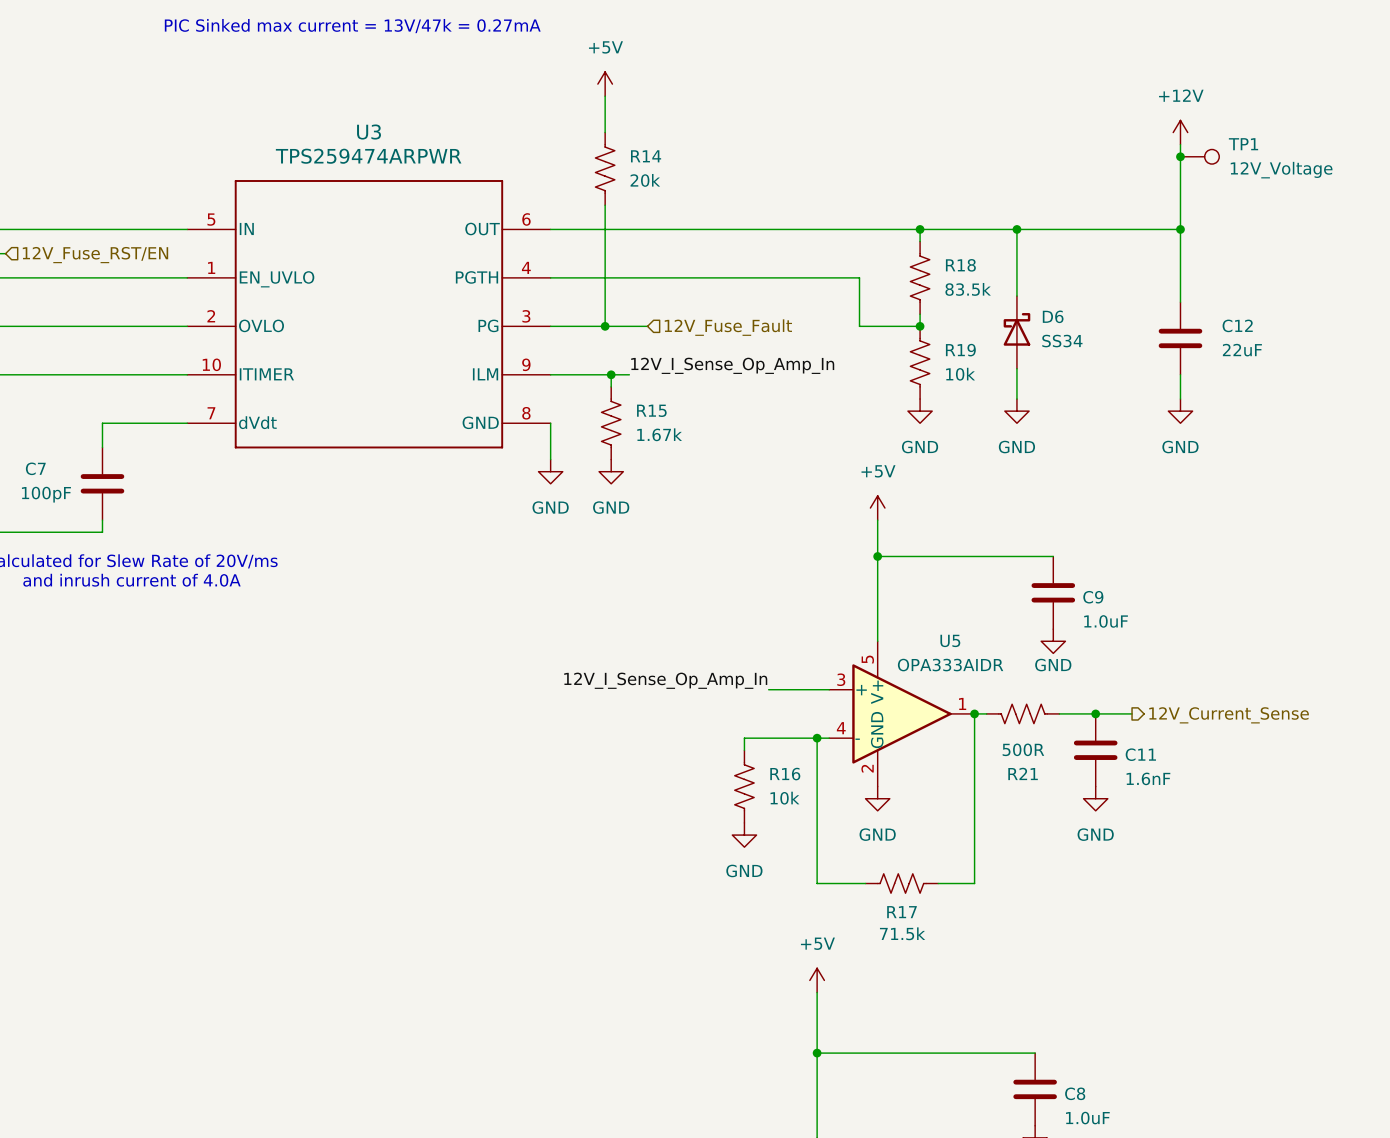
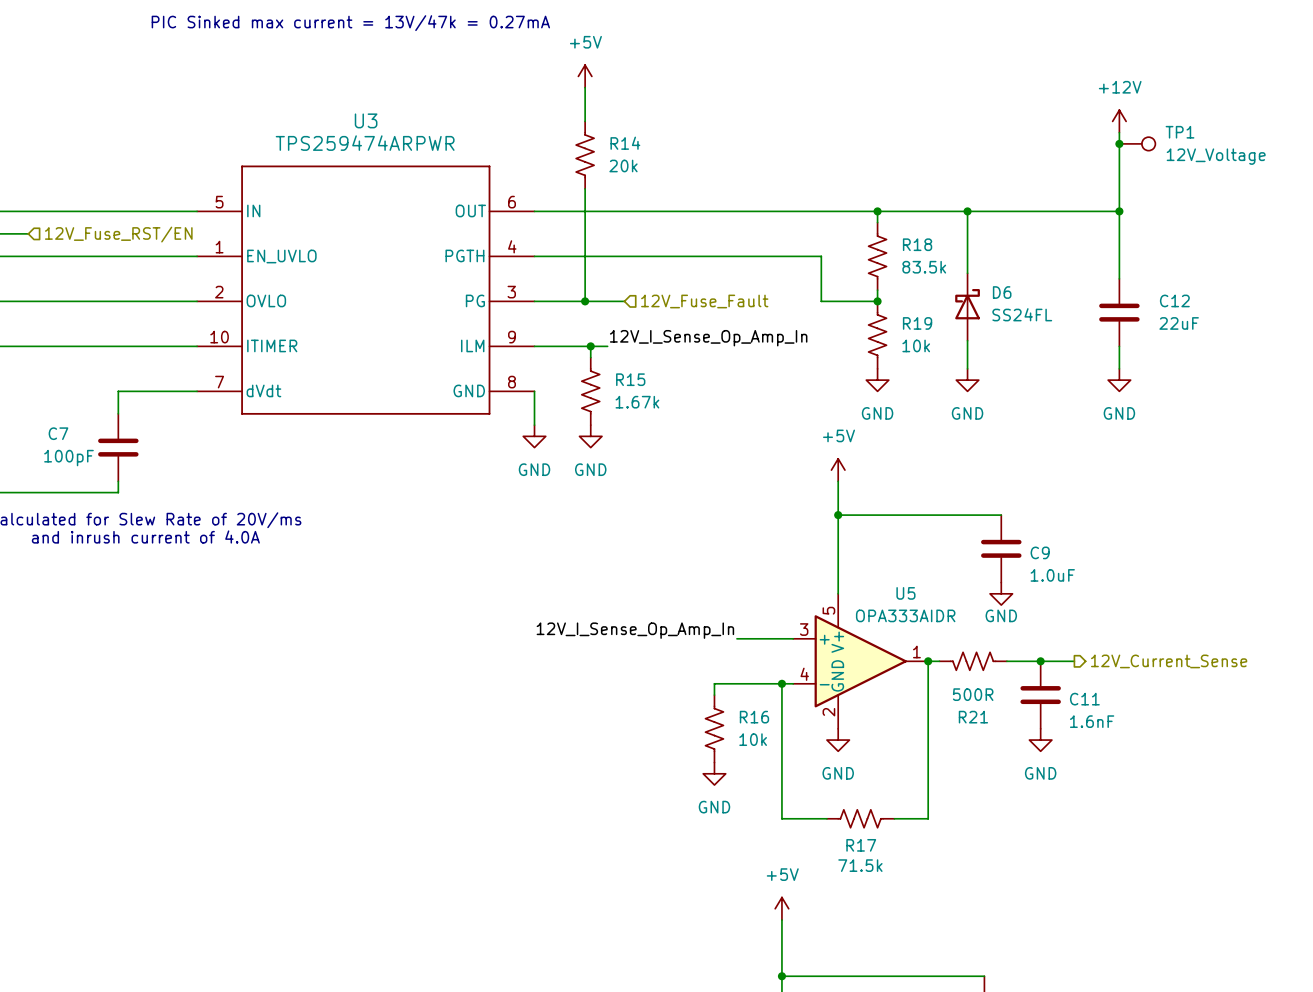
D6 value: SS34 (1062, 341) -> SS24FL (1022, 314)

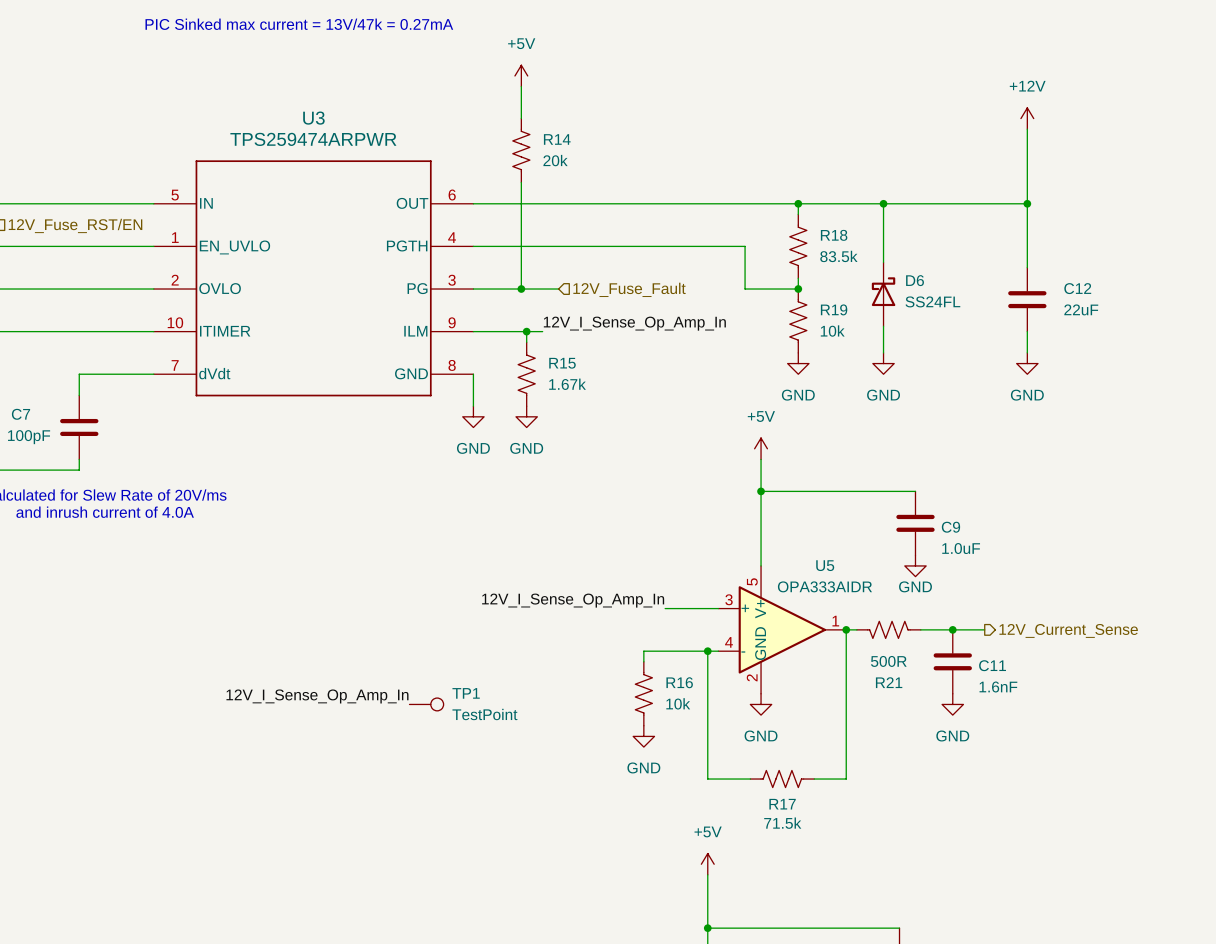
junction: (1119, 143) -> none
TP1 position: (1137, 143) -> (426, 704)
TP1 value: 12V_Voltage (1216, 156) -> TestPoint (484, 714)
label: none -> 12V_I_Sense_Op_Amp_In (317, 696)

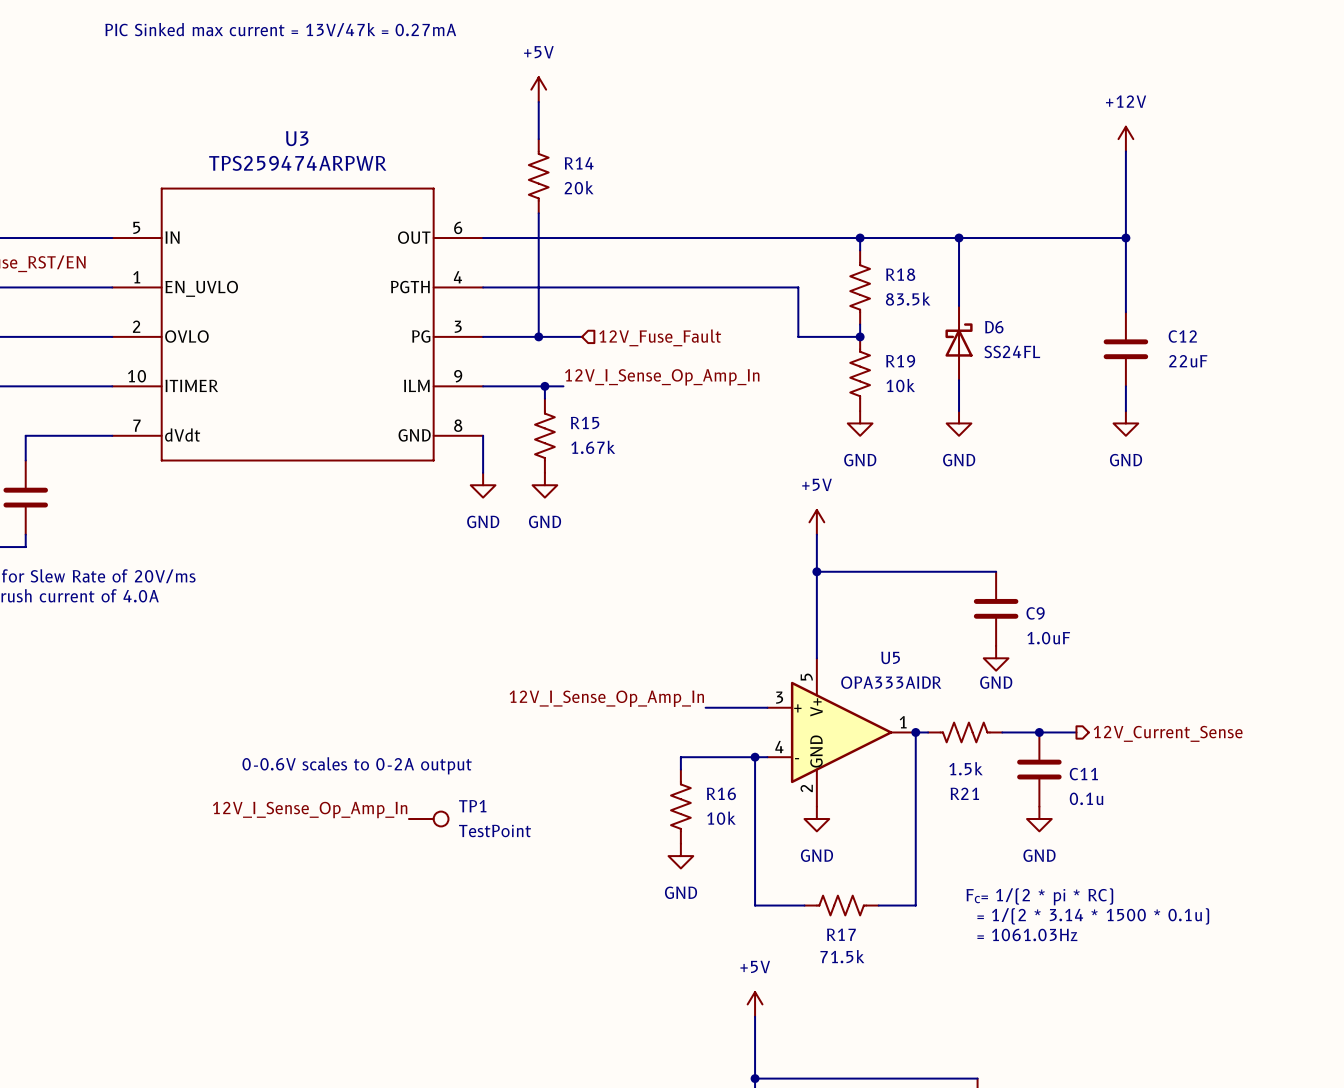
text: none -> 0-0.6V scales to 0-2A output (357, 765)
R21 value: 500R (888, 661) -> 1.5k (966, 768)
C11 value: 1.6nF (998, 687) -> 0.1u (1086, 798)
text: none -> Fc= 1/(2 * pi * RC) (1039, 896)
text: none -> = 1/(2 * 3.14 * 1500 * 0.1u) (1093, 916)
text: none -> = 1061.03Hz (1027, 934)

